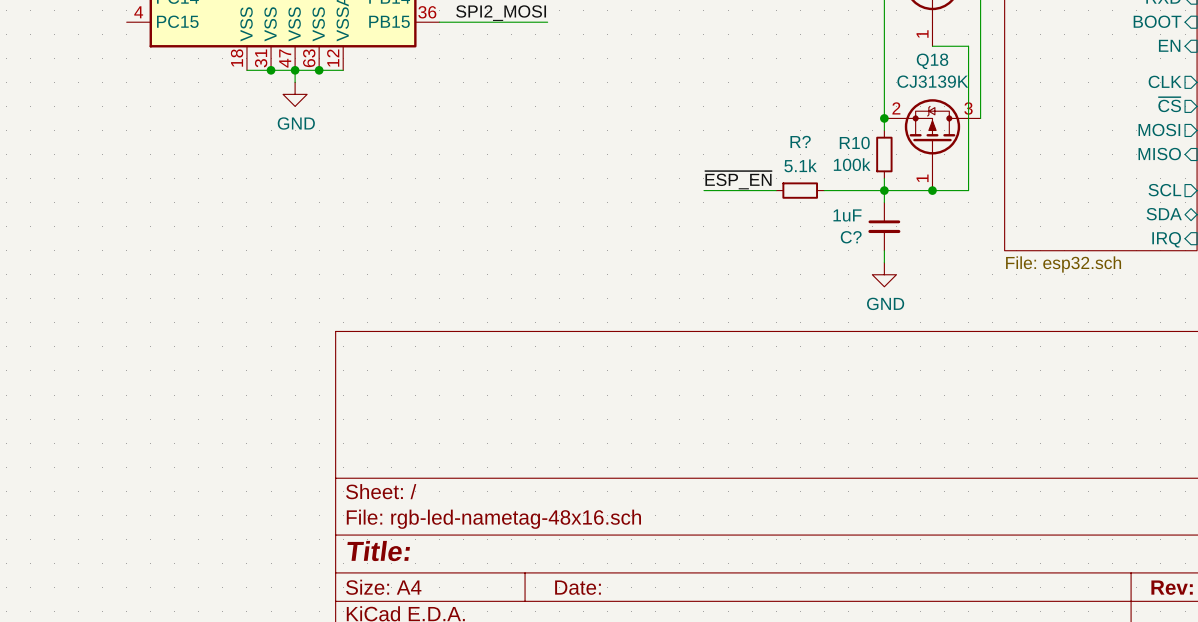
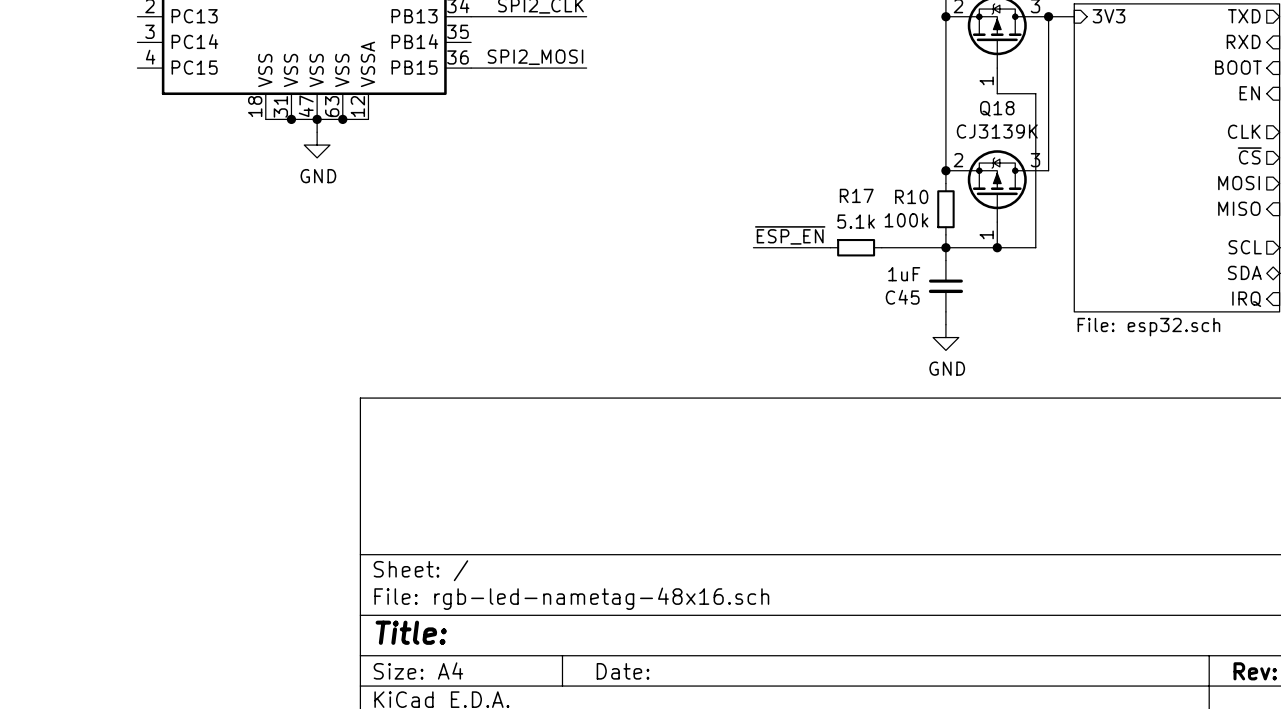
R? name: R? (800, 141) -> R17 (856, 195)
C? name: C? (851, 237) -> C45 (902, 297)

